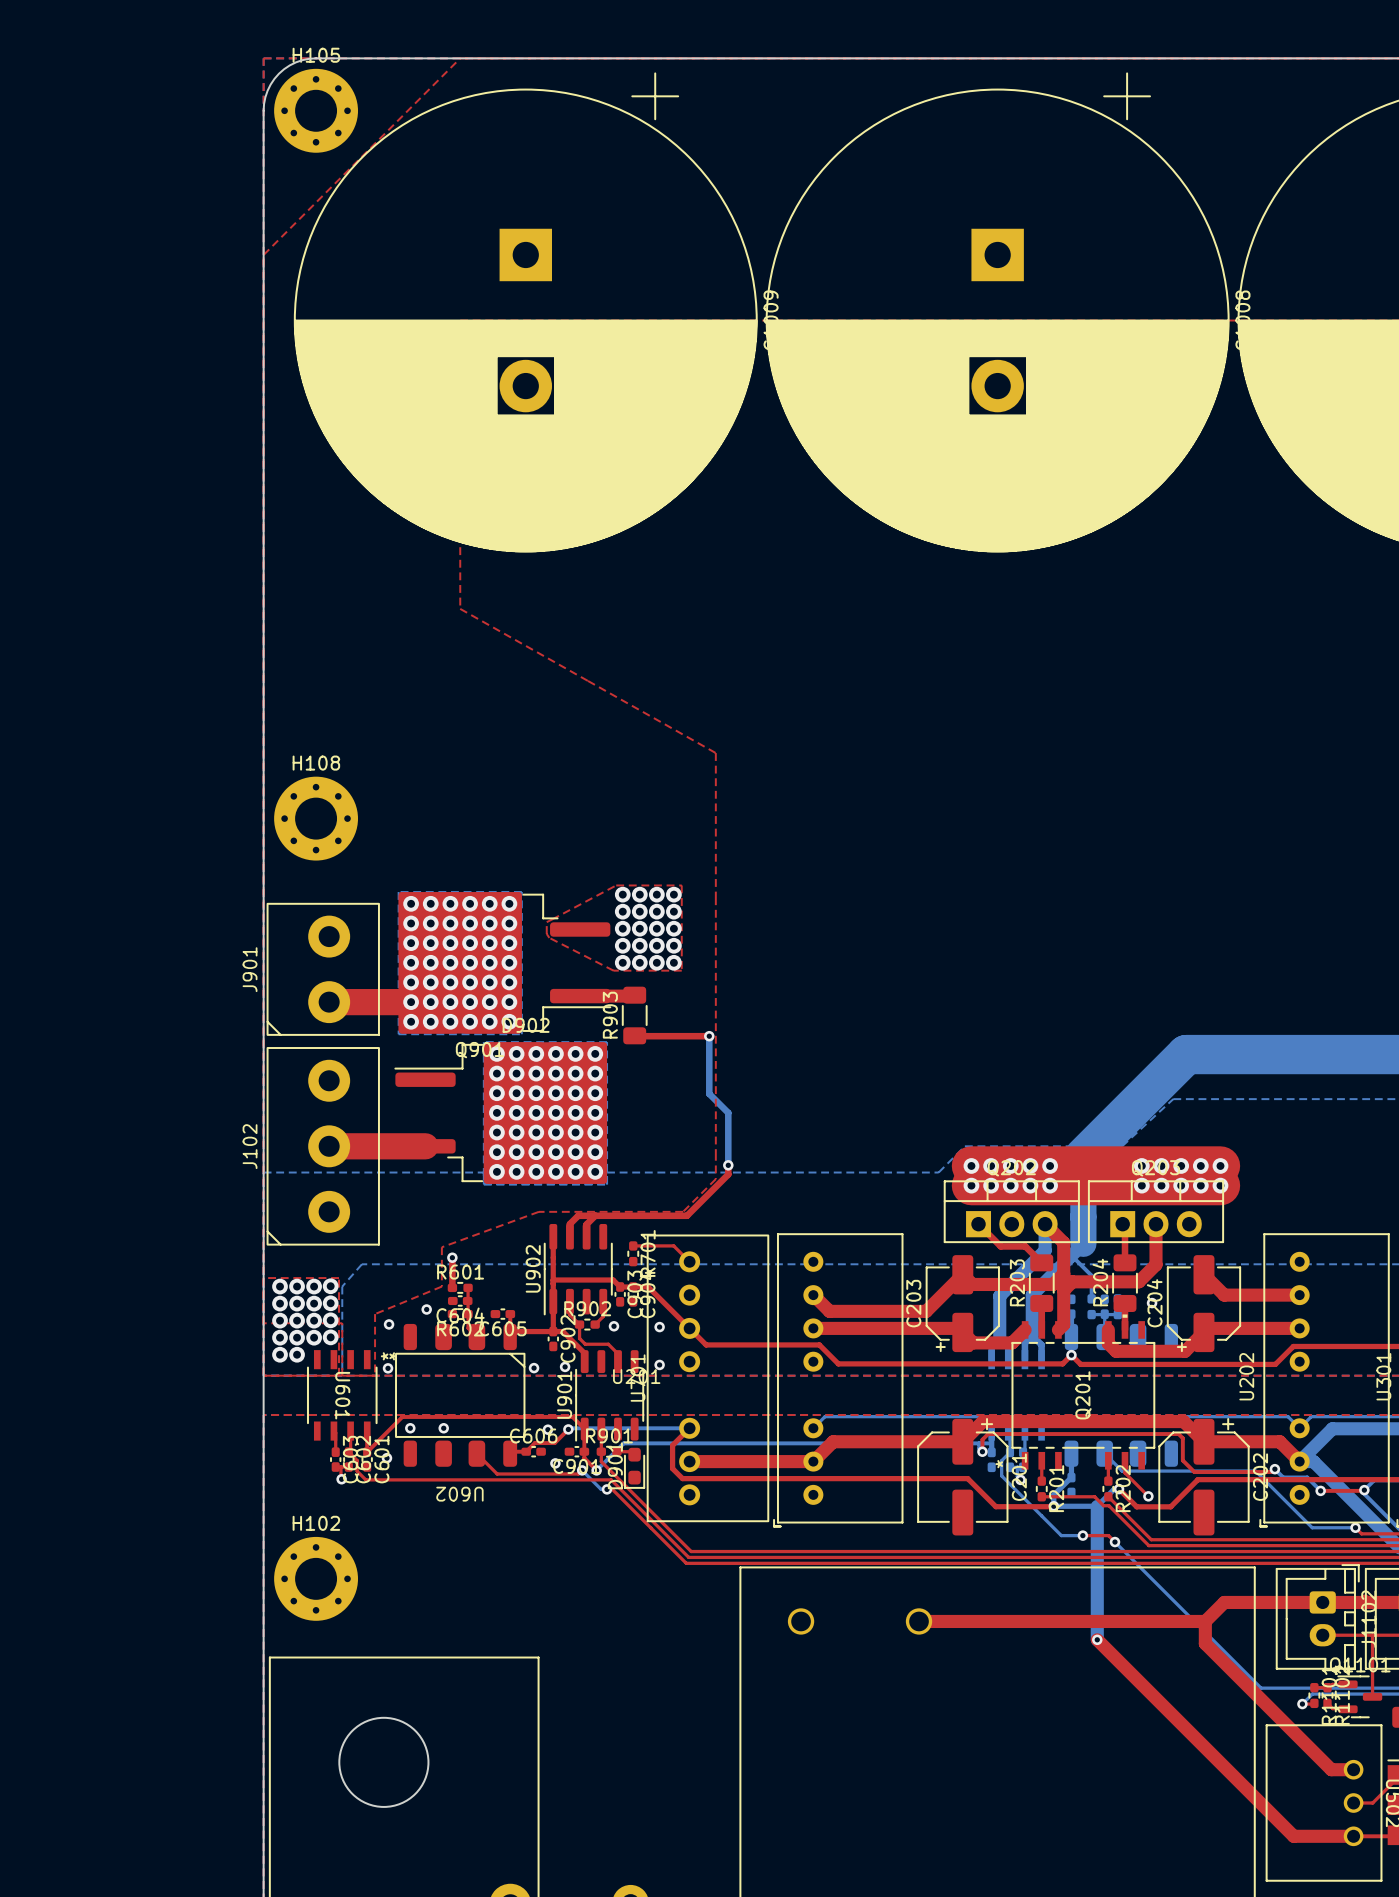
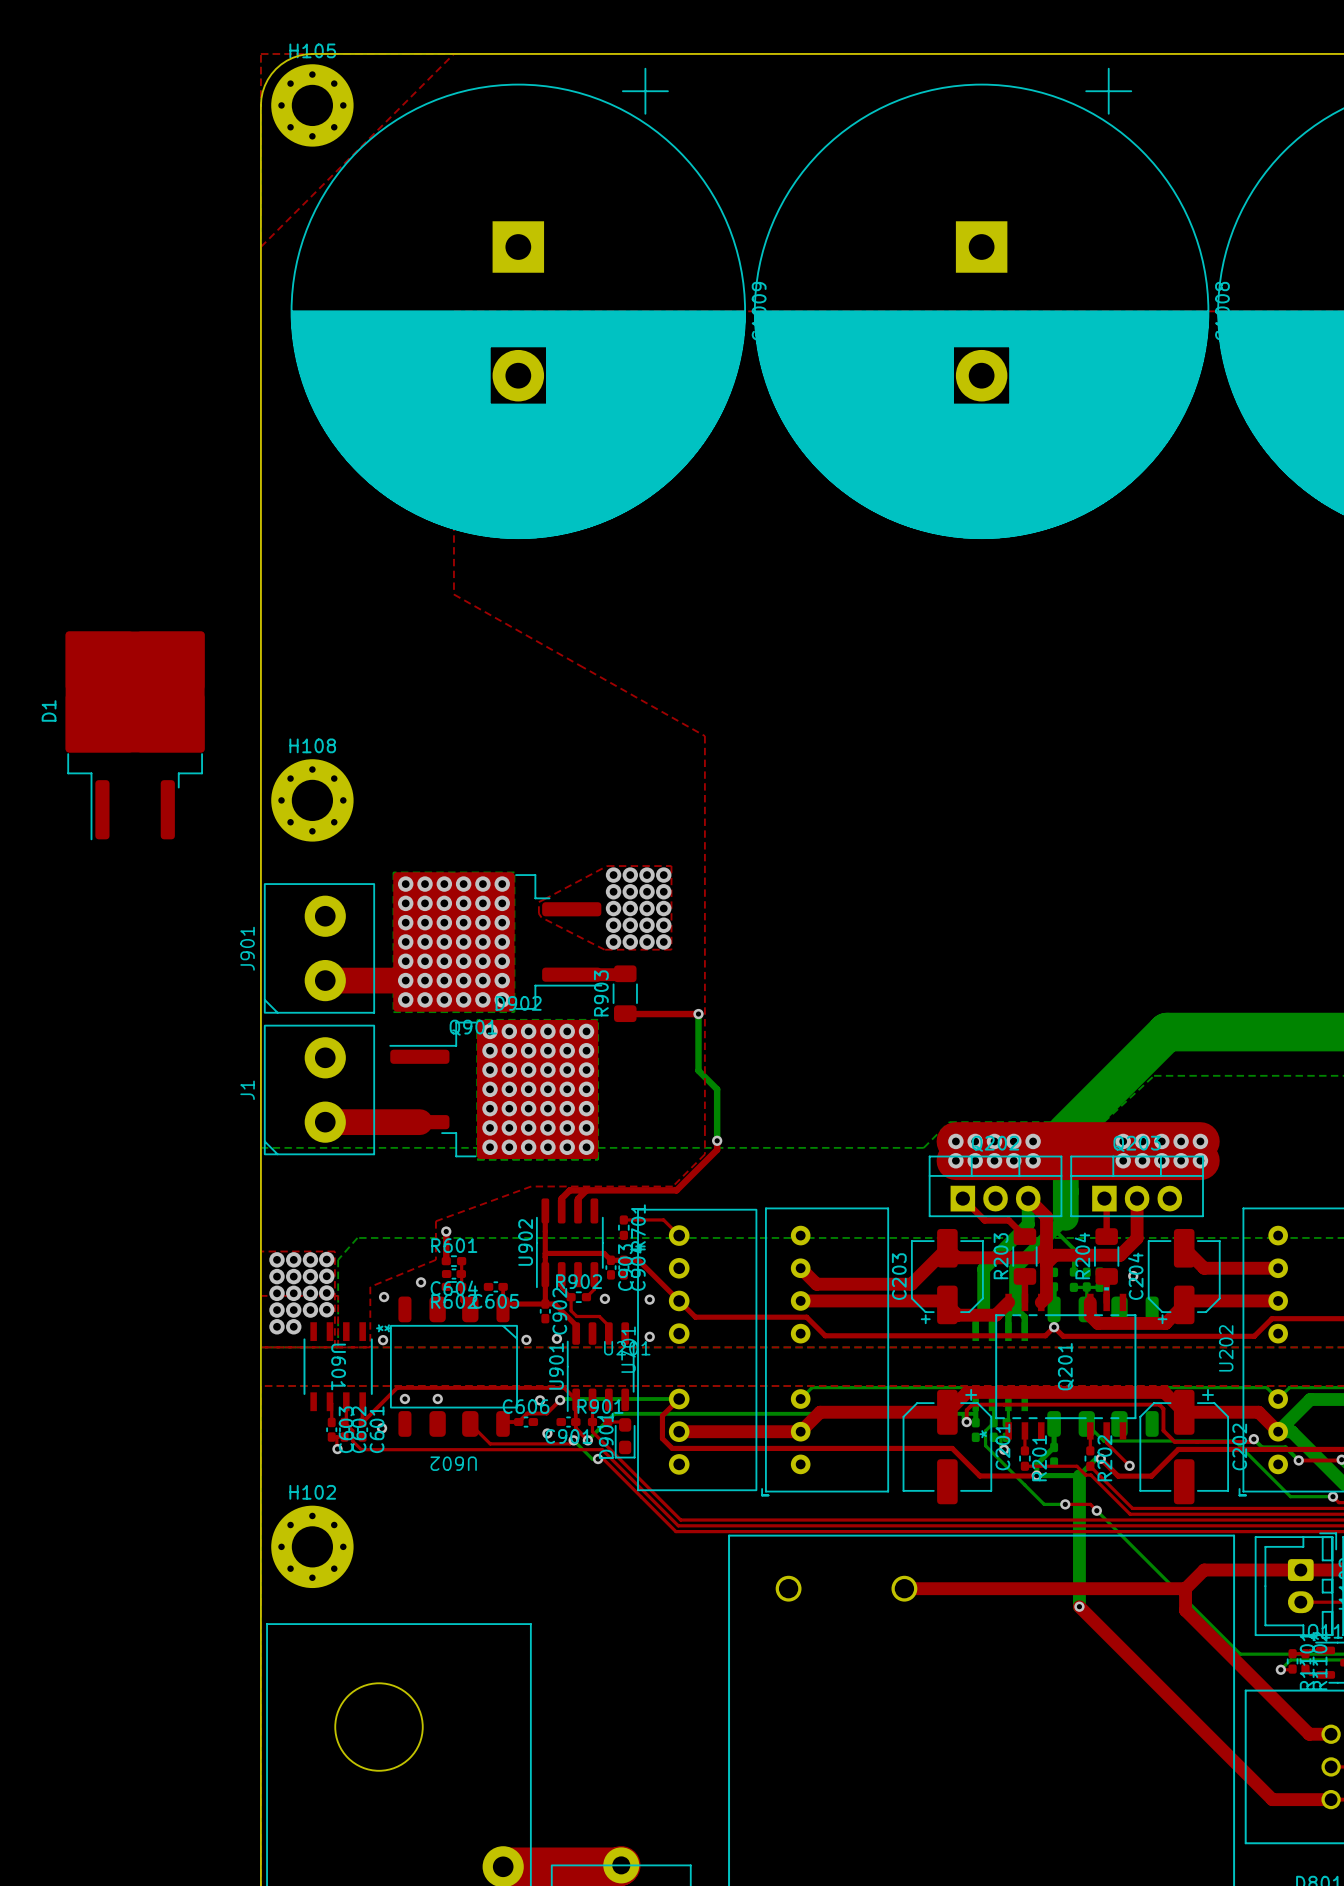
D1: none -> (135, 735)
J1: none -> (319, 1089)
J102: (323, 1146) -> none

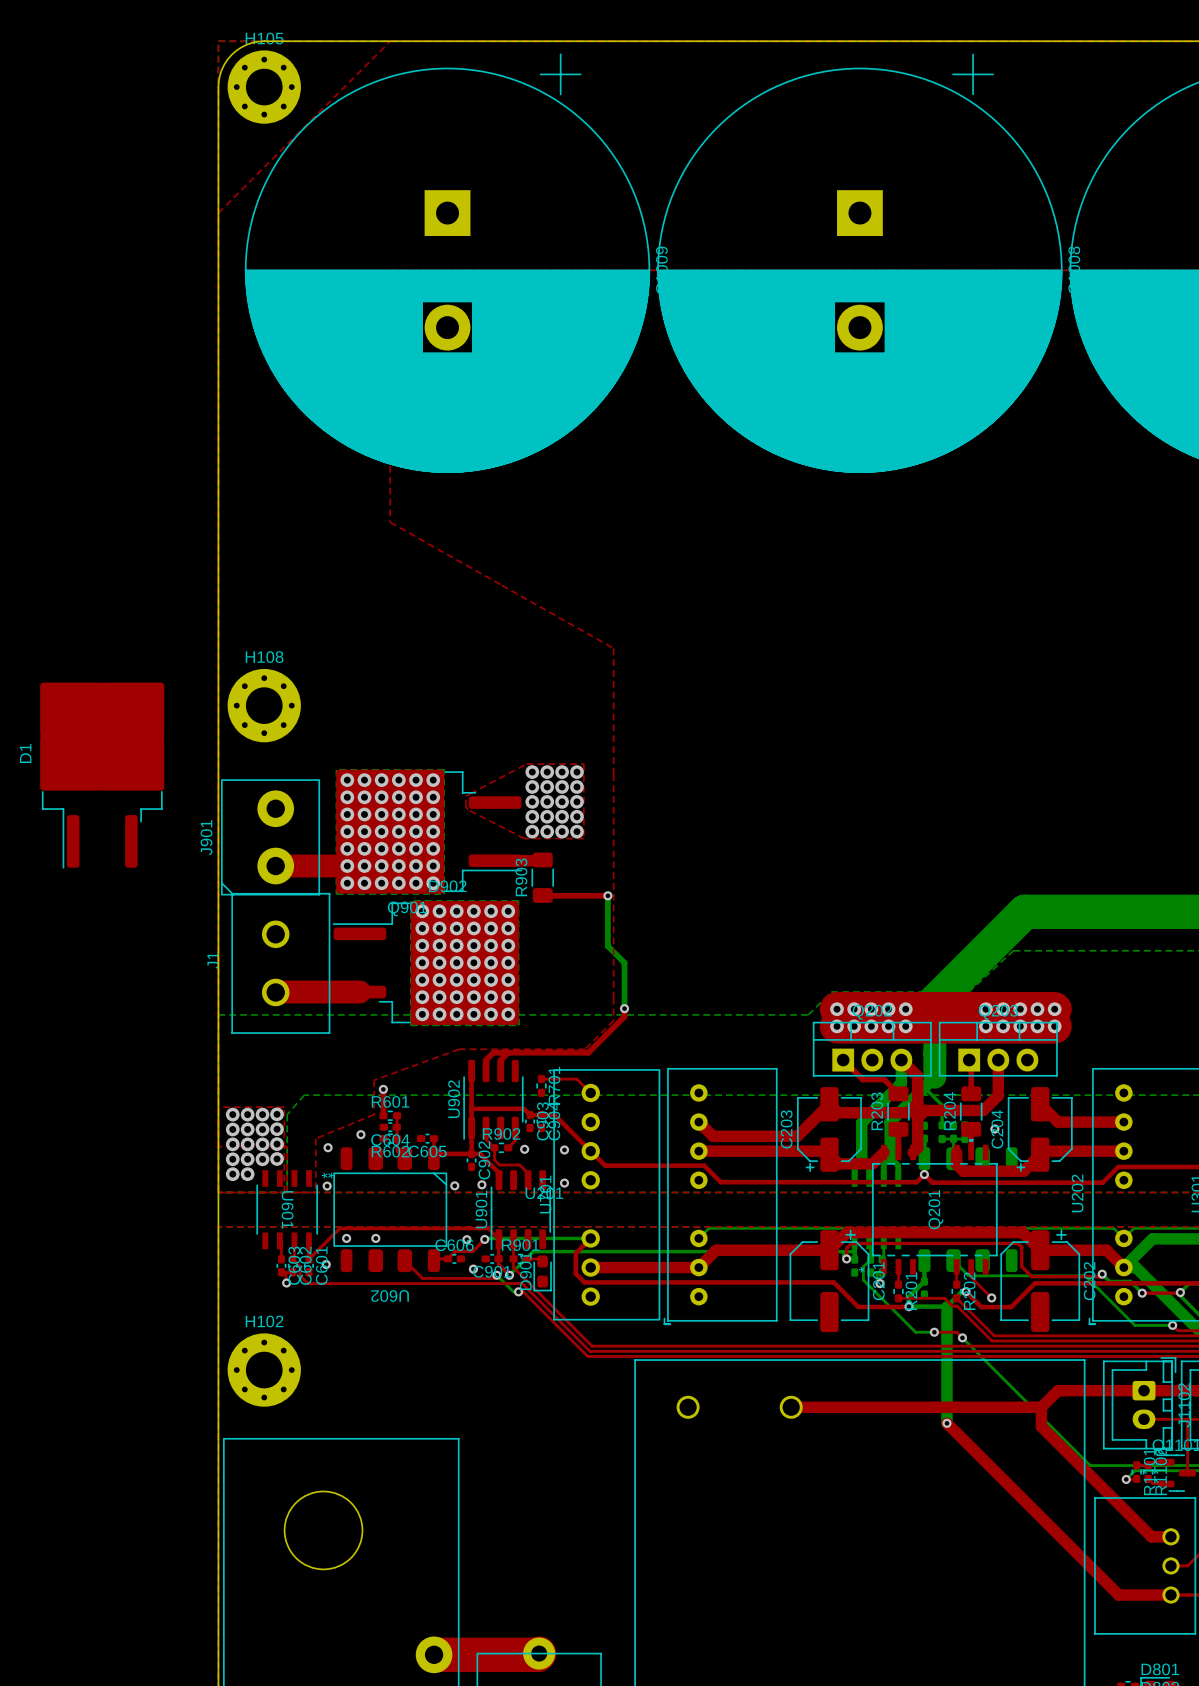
D1 position: (135, 735) -> (102, 775)
J1 footprint: [264, 1024, 375, 1155] -> [231, 893, 331, 1034]

